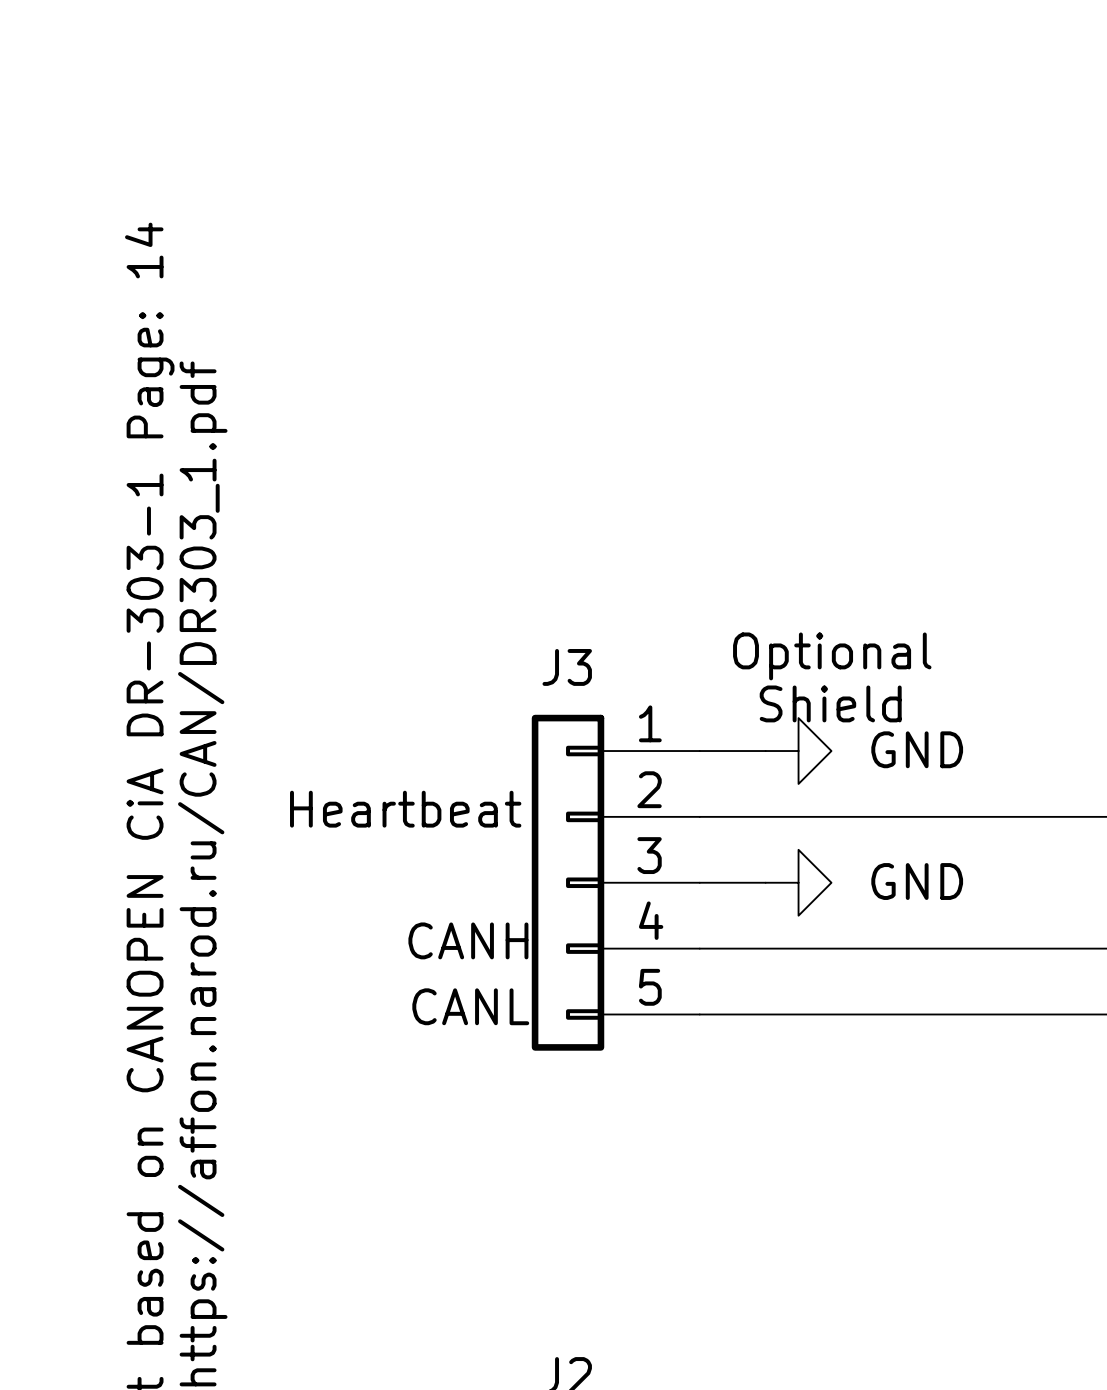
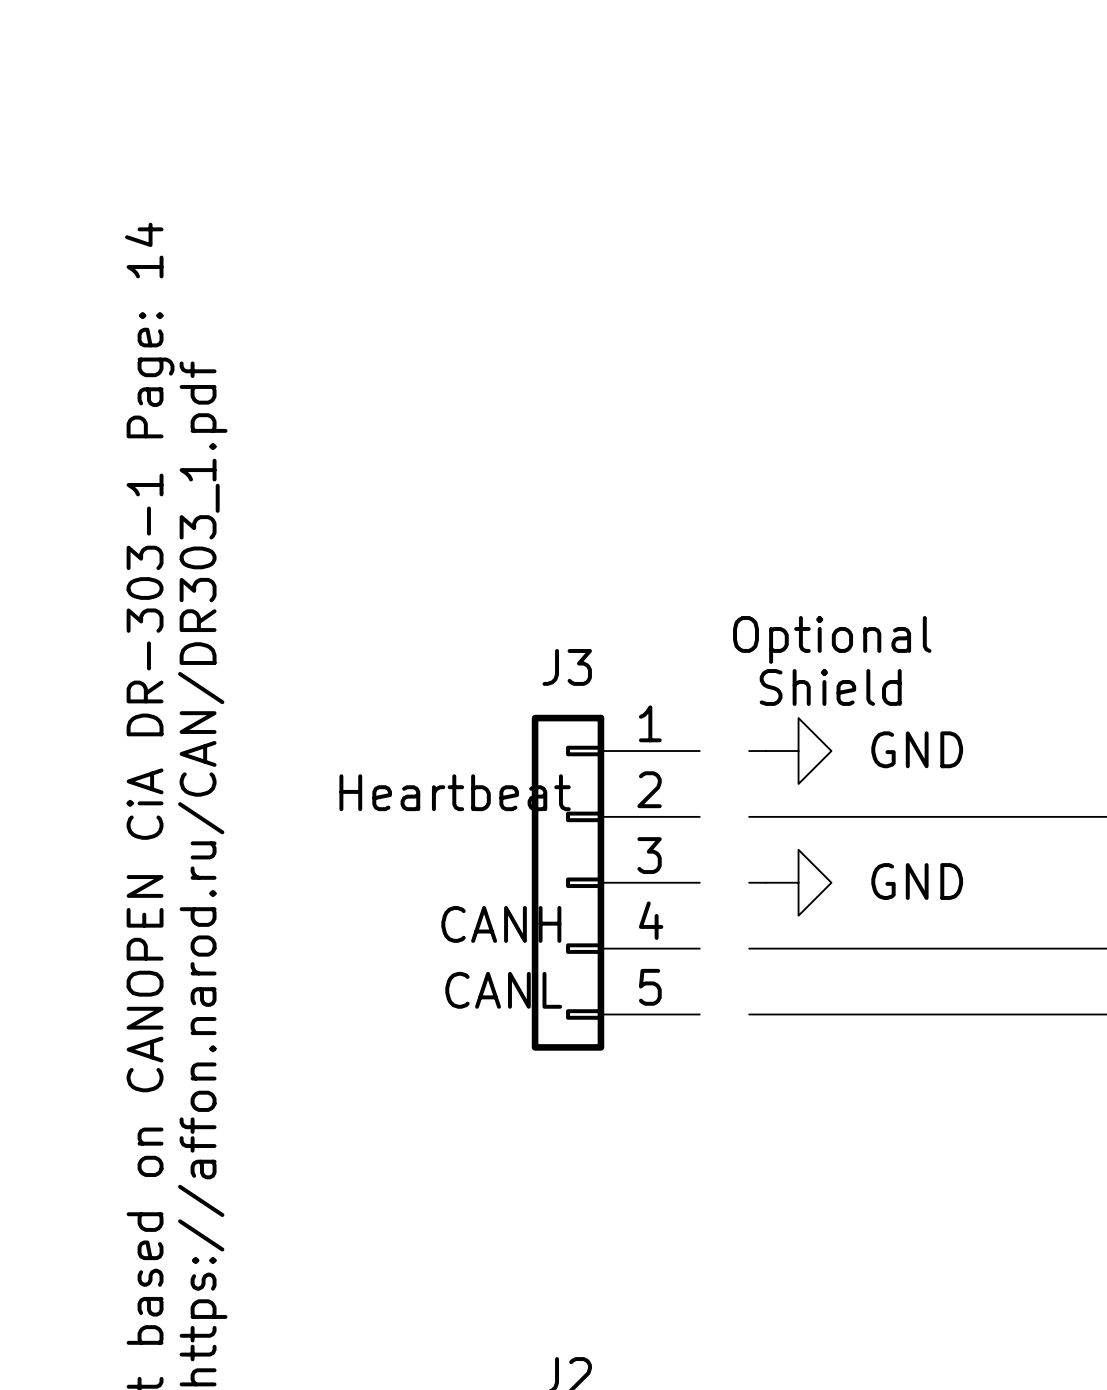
text position: Optional (832, 656) -> Optional (832, 639)
text position: Shield (830, 703) -> Shield (830, 687)
wire: (699, 751) (749, 751) -> none
text position: Heartbeat (405, 809) -> Heartbeat (455, 792)
wire: (699, 816) (749, 816) -> none
wire: (699, 882) (749, 882) -> none
text position: CANH (468, 940) -> CANH (501, 924)
wire: (699, 948) (749, 948) -> none
text position: CANL (470, 1006) -> CANL (503, 990)
wire: (699, 1014) (749, 1014) -> none

